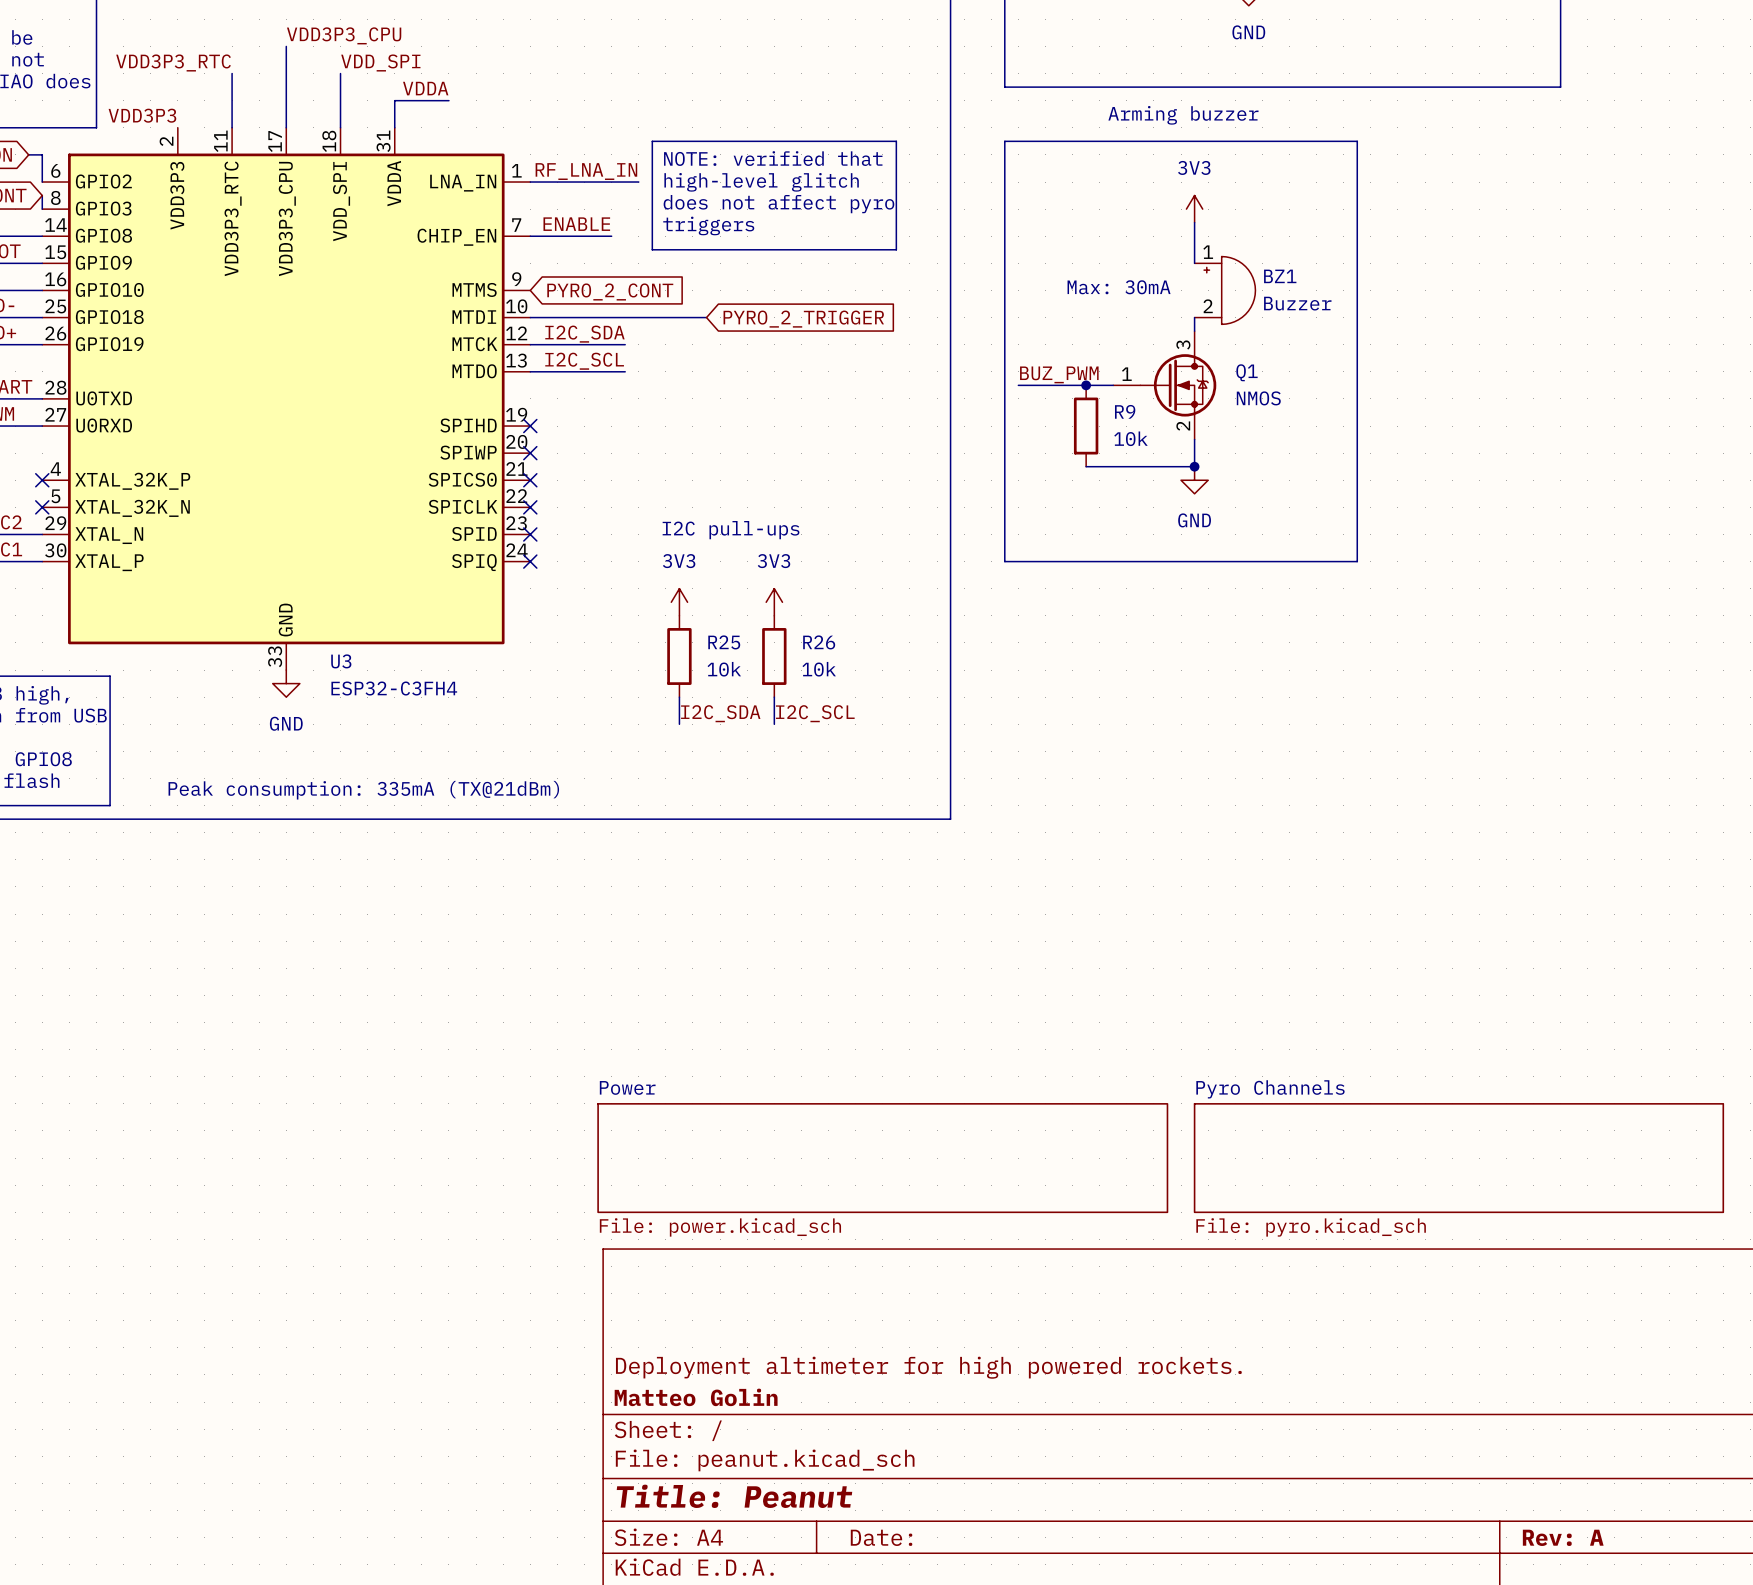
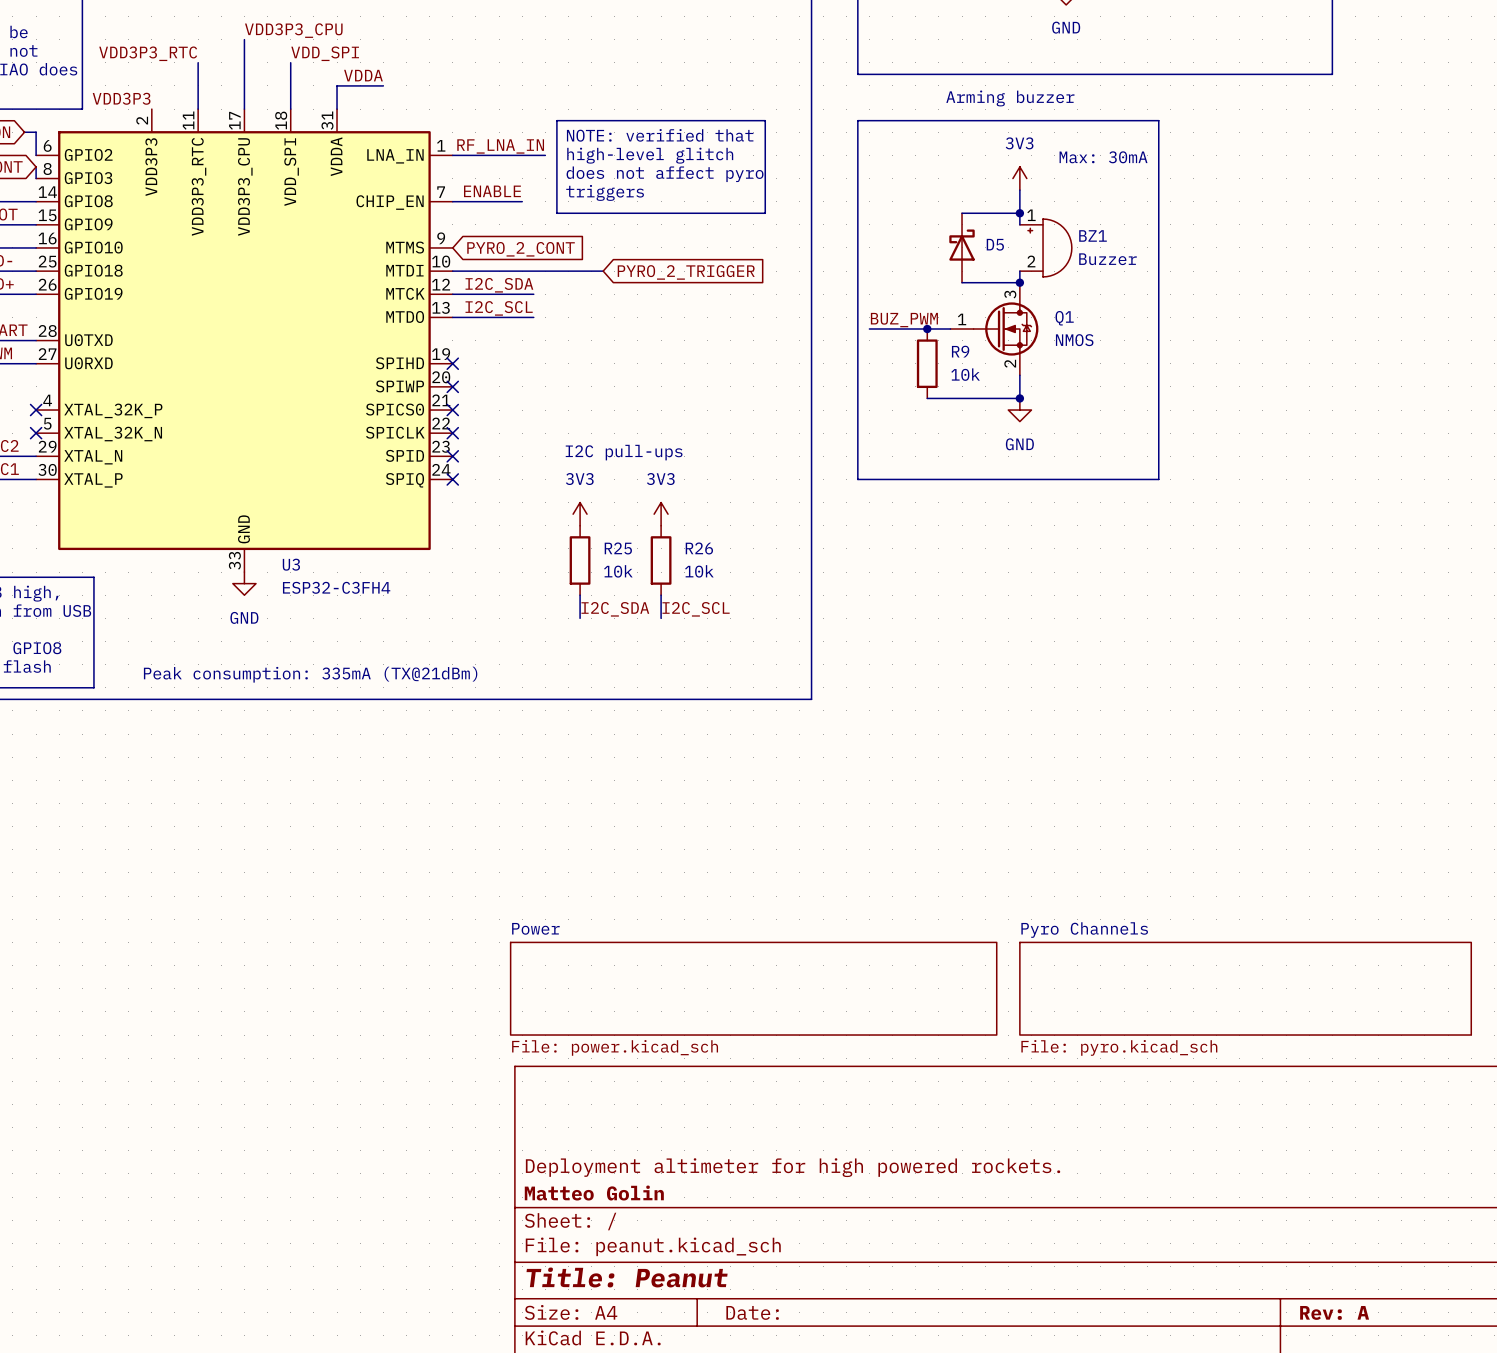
wire: none -> (962, 213) (1019, 213)
junction: none -> (1019, 213)
text position: Max: 30mA (1119, 287) -> Max: 30mA (1103, 157)
D5: none -> (962, 247)
wire: none -> (962, 282) (1019, 282)
junction: none -> (1019, 282)

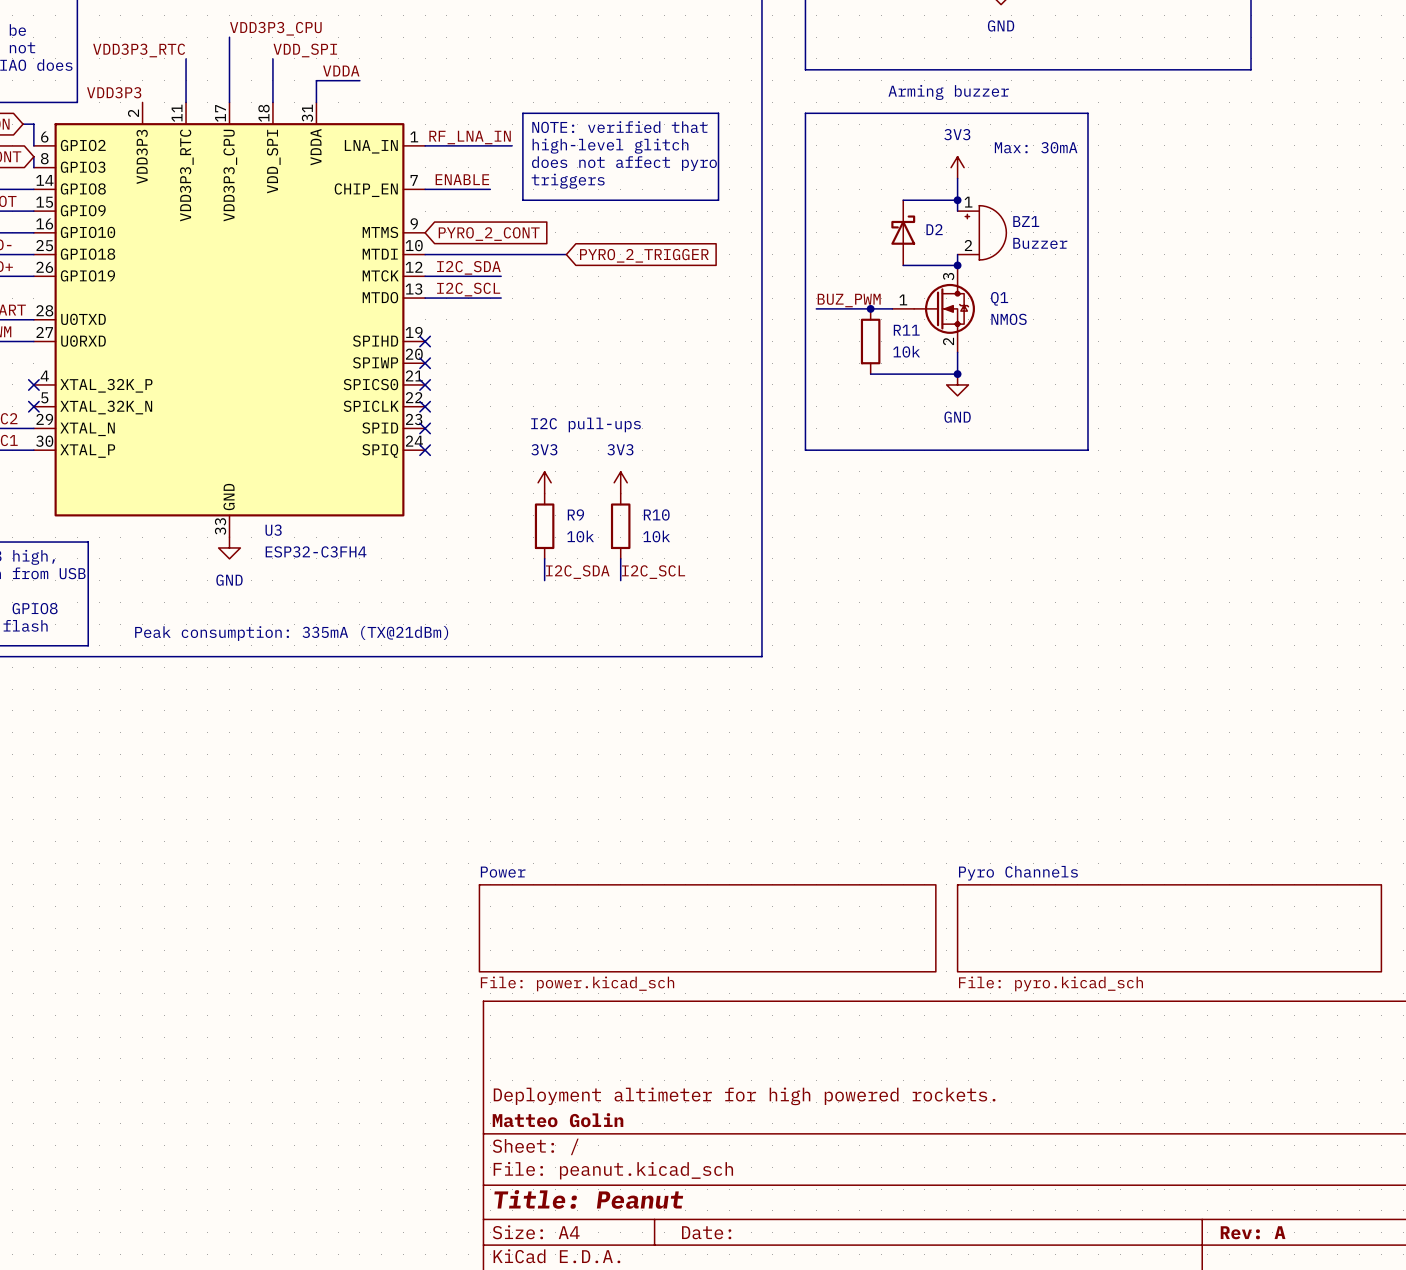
D5 name: D5 (995, 244) -> D2 (934, 229)
R9 name: R9 (960, 351) -> R11 (906, 330)
R25 name: R25 (618, 548) -> R9 (575, 514)
R26 name: R26 (699, 548) -> R10 (656, 514)

